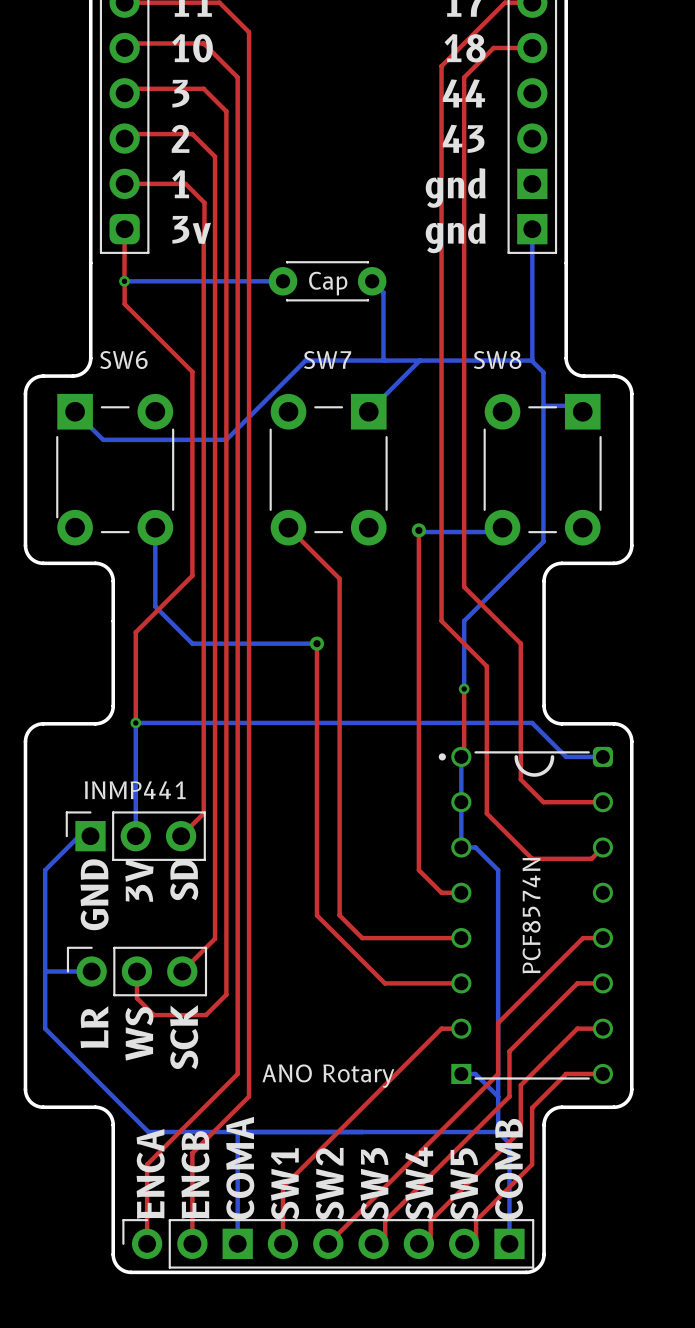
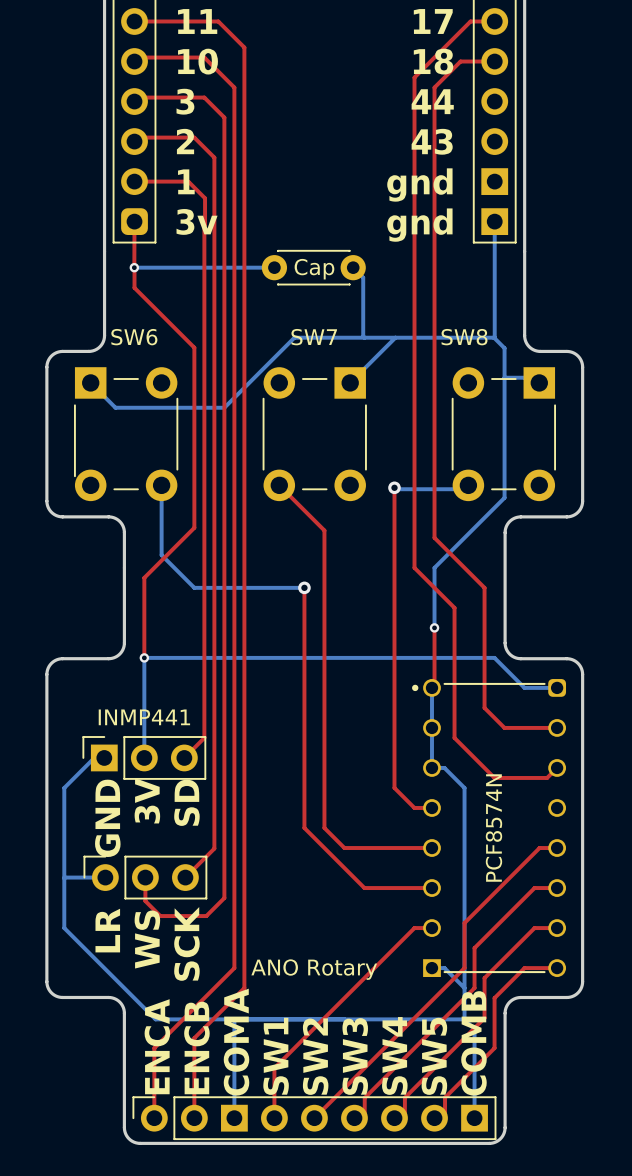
line: (516, 756) (521, 769) (534, 775) (547, 769) (552, 756) -> none

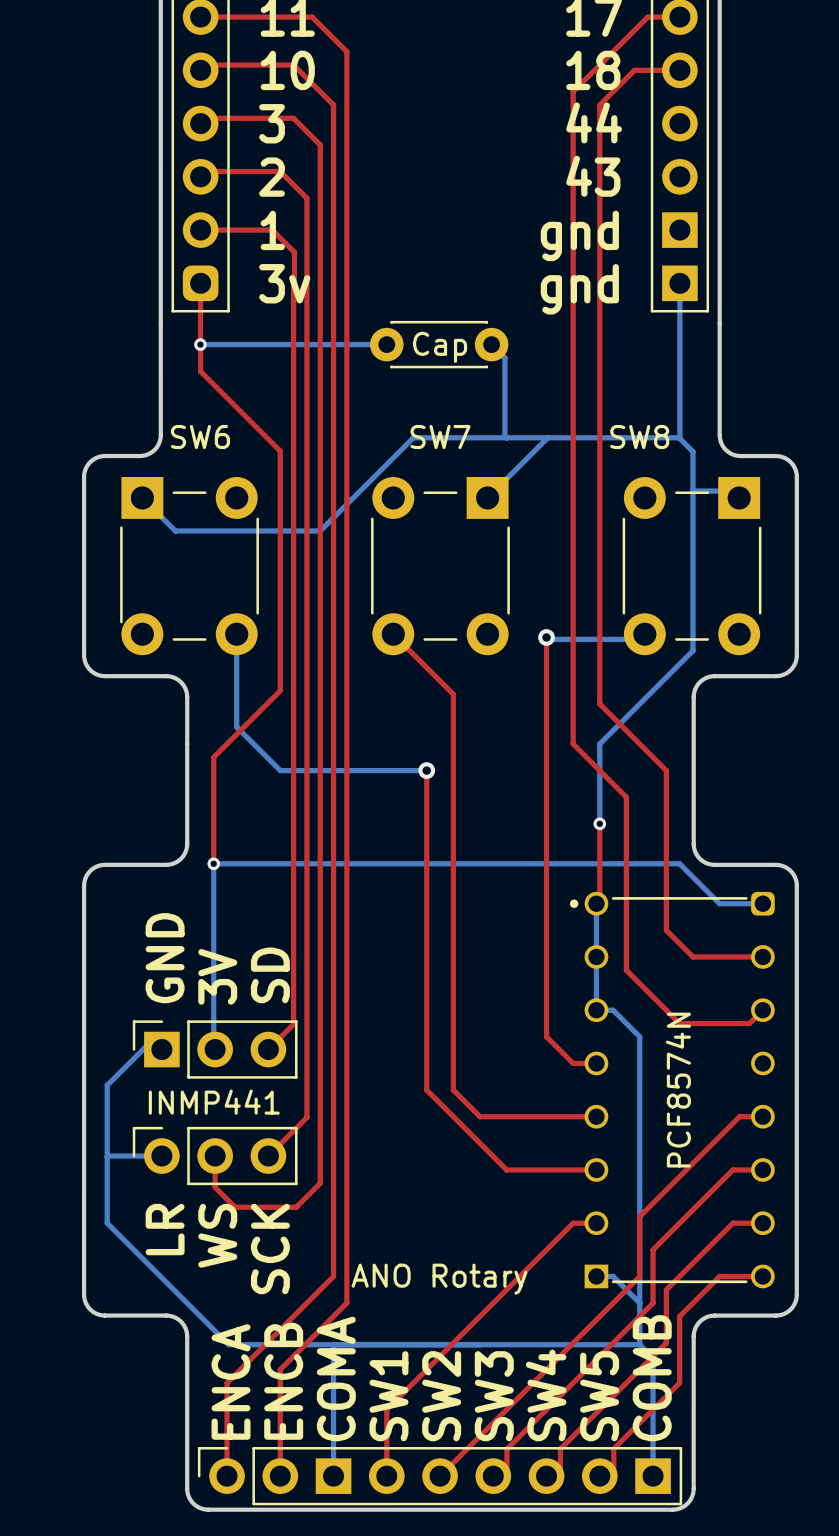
INMP441 name position: INMP441 (144, 717) -> INMP441 (214, 1102)
top track: (204, 737) (184, 757) -> (293, 970) (293, 1024) (268, 1049)
bottom track: (104, 757) (94, 757) (64, 787) (64, 824) -> (175, 1048) (175, 1044) (167, 1036) (156, 1036) (107, 1085)
bottom track: none -> (213, 996) (215, 1049)
INMP441 position: (144, 757) -> (215, 1049)
text position: 3V (147, 800) -> 3V (217, 976)
text position: SD (186, 802) -> SD (270, 975)
text position: GND (107, 818) -> GND (165, 958)

